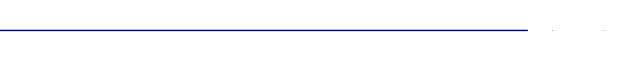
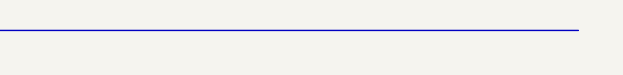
bus: none -> (527, 30) (578, 30)

